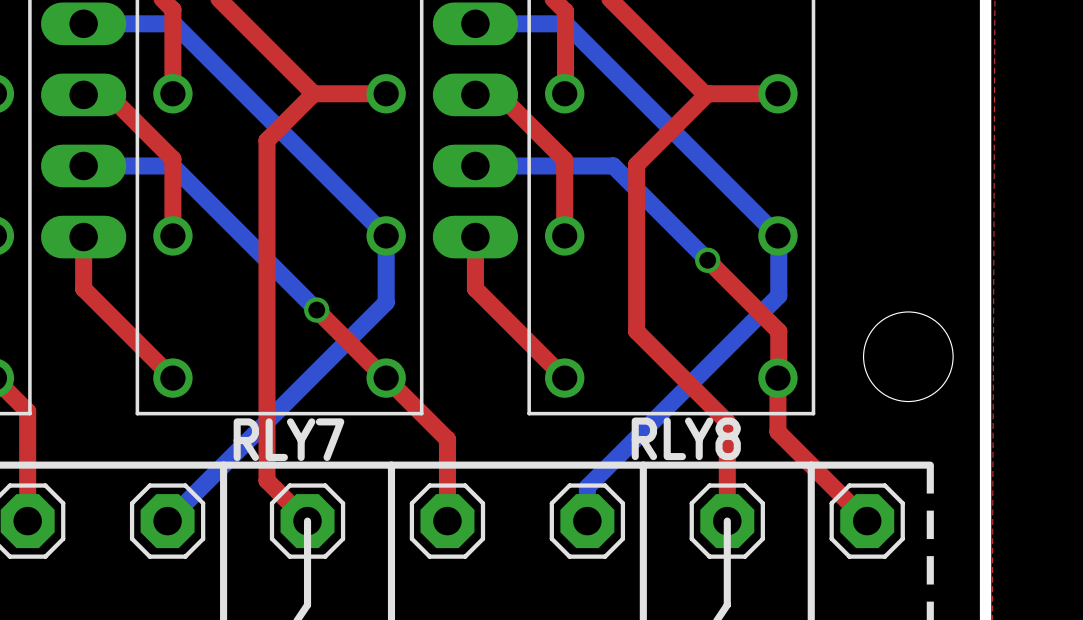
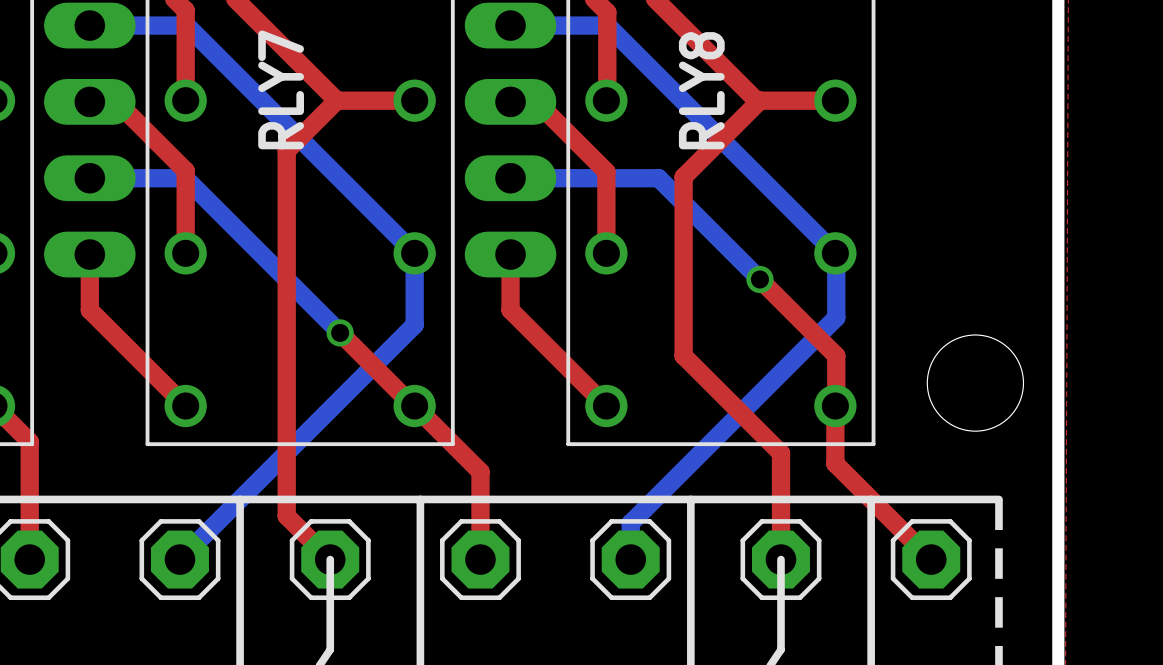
RLY8 name rotation: 0° (686, 438) -> 90° counterclockwise (701, 90)
RLY8 name position: RLY8 (686, 438) -> RLY8 (701, 90)
RLY7 name rotation: 0° (288, 439) -> 90° counterclockwise (281, 89)
RLY7 name position: RLY7 (288, 439) -> RLY7 (281, 89)

